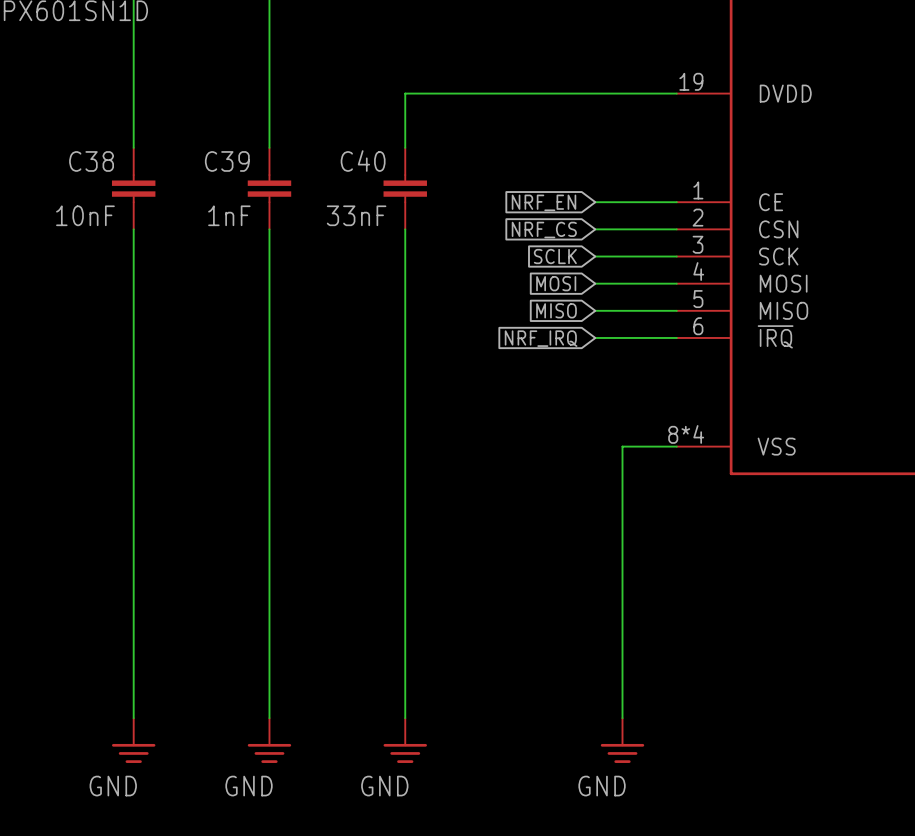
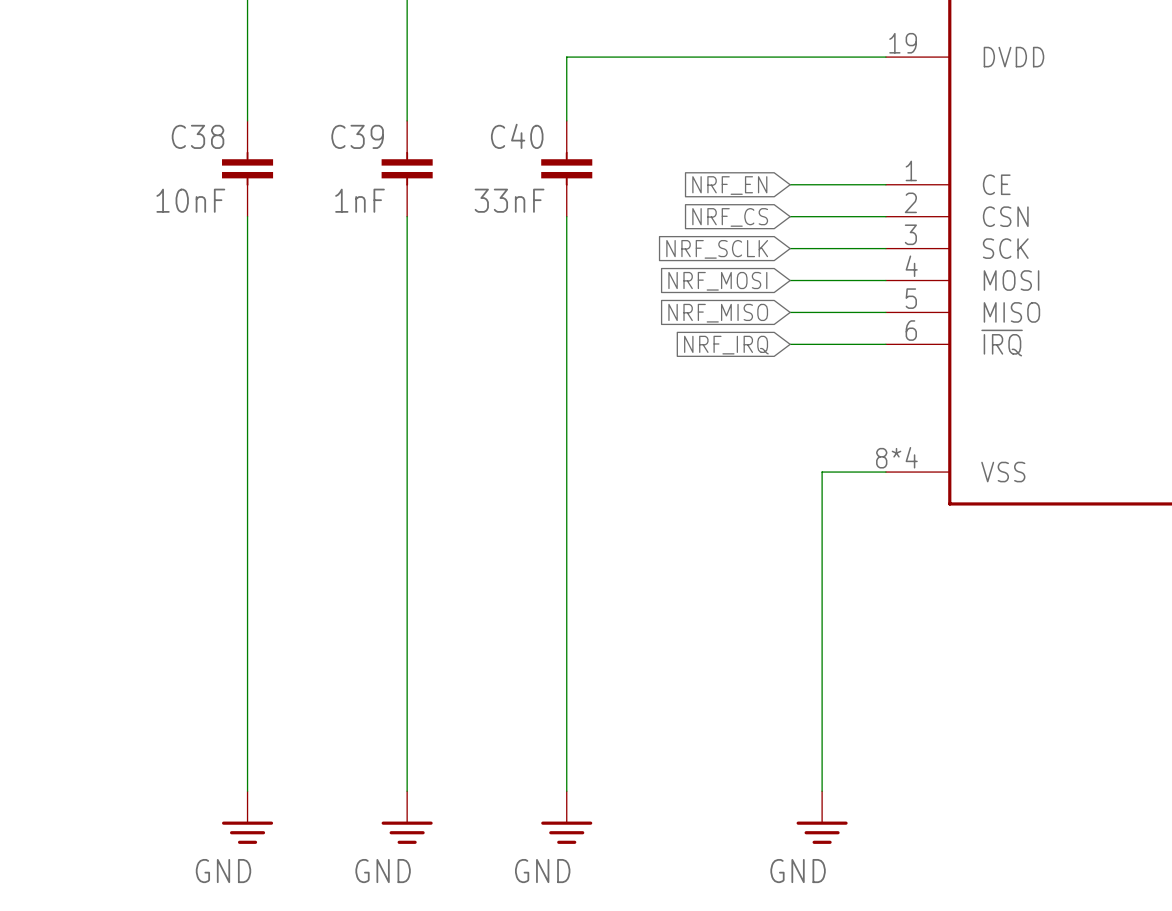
global label: SCLK (555, 256) -> NRF_SCLK (717, 249)
global label: MOSI (556, 283) -> NRF_MOSI (717, 281)
global label: MISO (556, 310) -> NRF_MISO (718, 313)

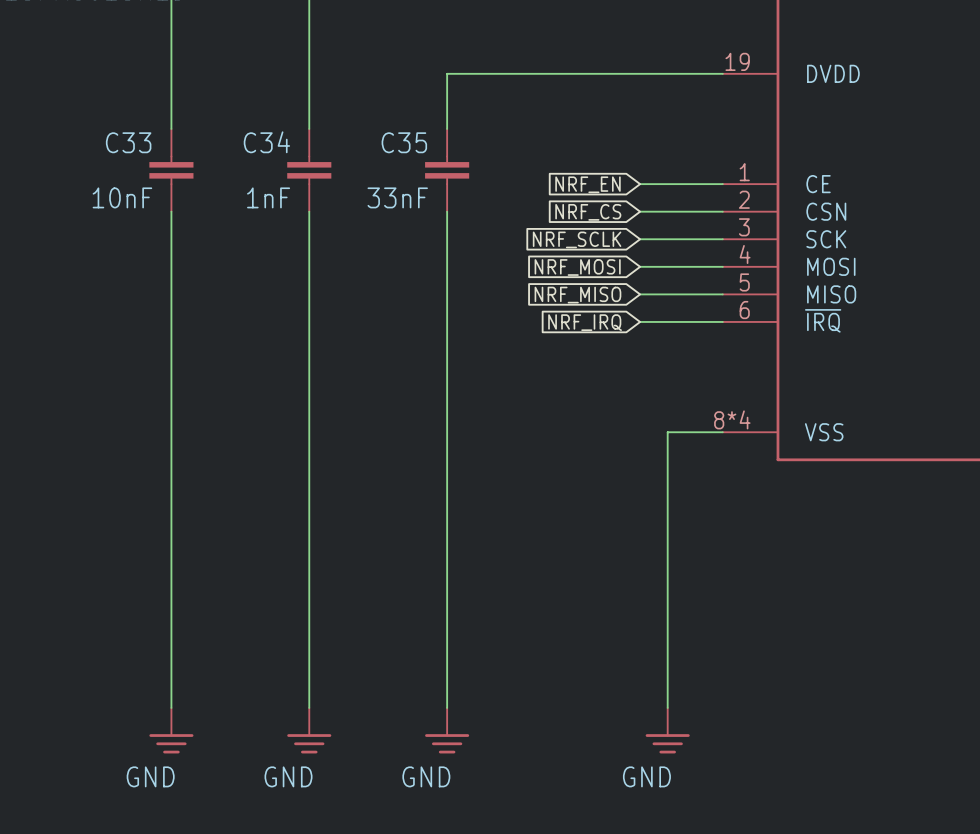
C38 name: C38 (198, 136) -> C33 (128, 142)
C39 name: C39 (357, 136) -> C34 (266, 142)
C40 name: C40 (517, 136) -> C35 (404, 142)

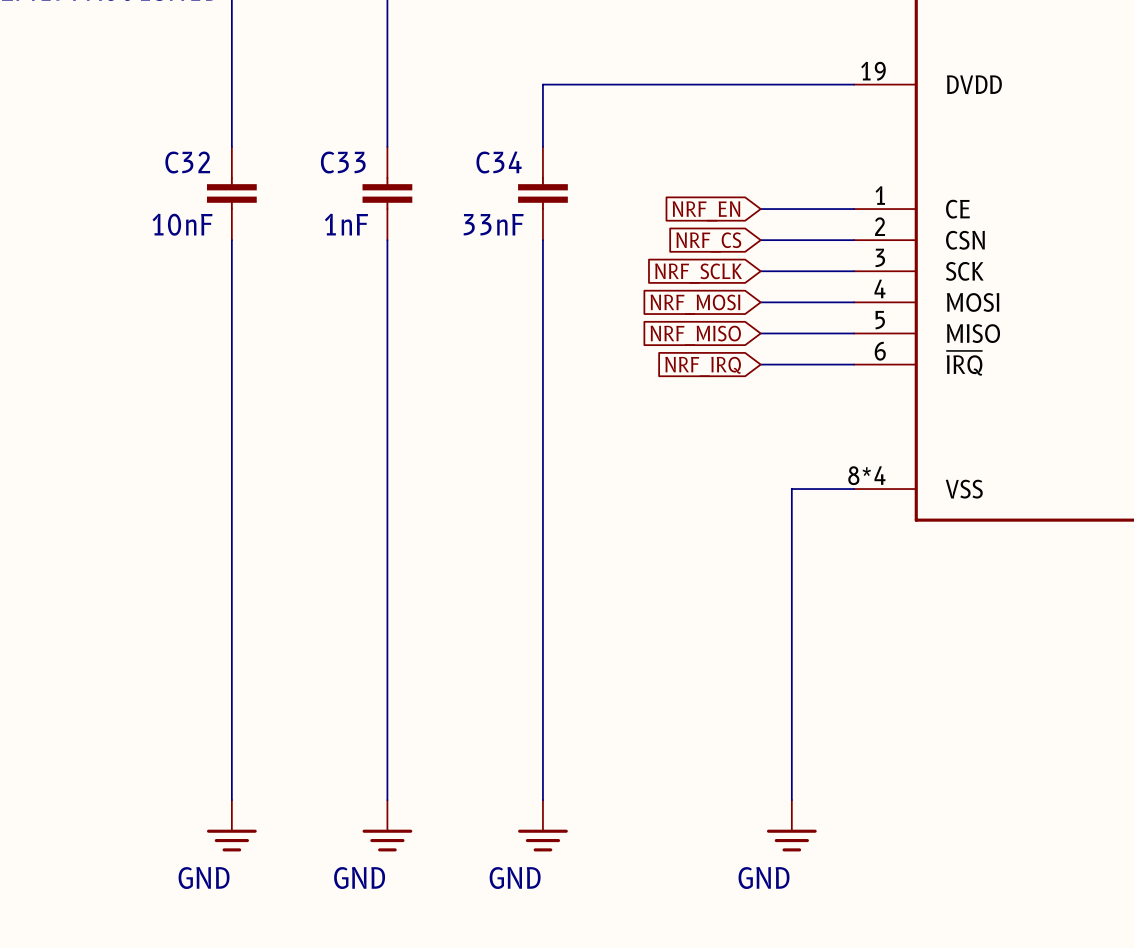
C33 name: C33 (128, 142) -> C32 (187, 162)
C34 name: C34 (266, 142) -> C33 (343, 162)
C35 name: C35 (404, 142) -> C34 (499, 162)

